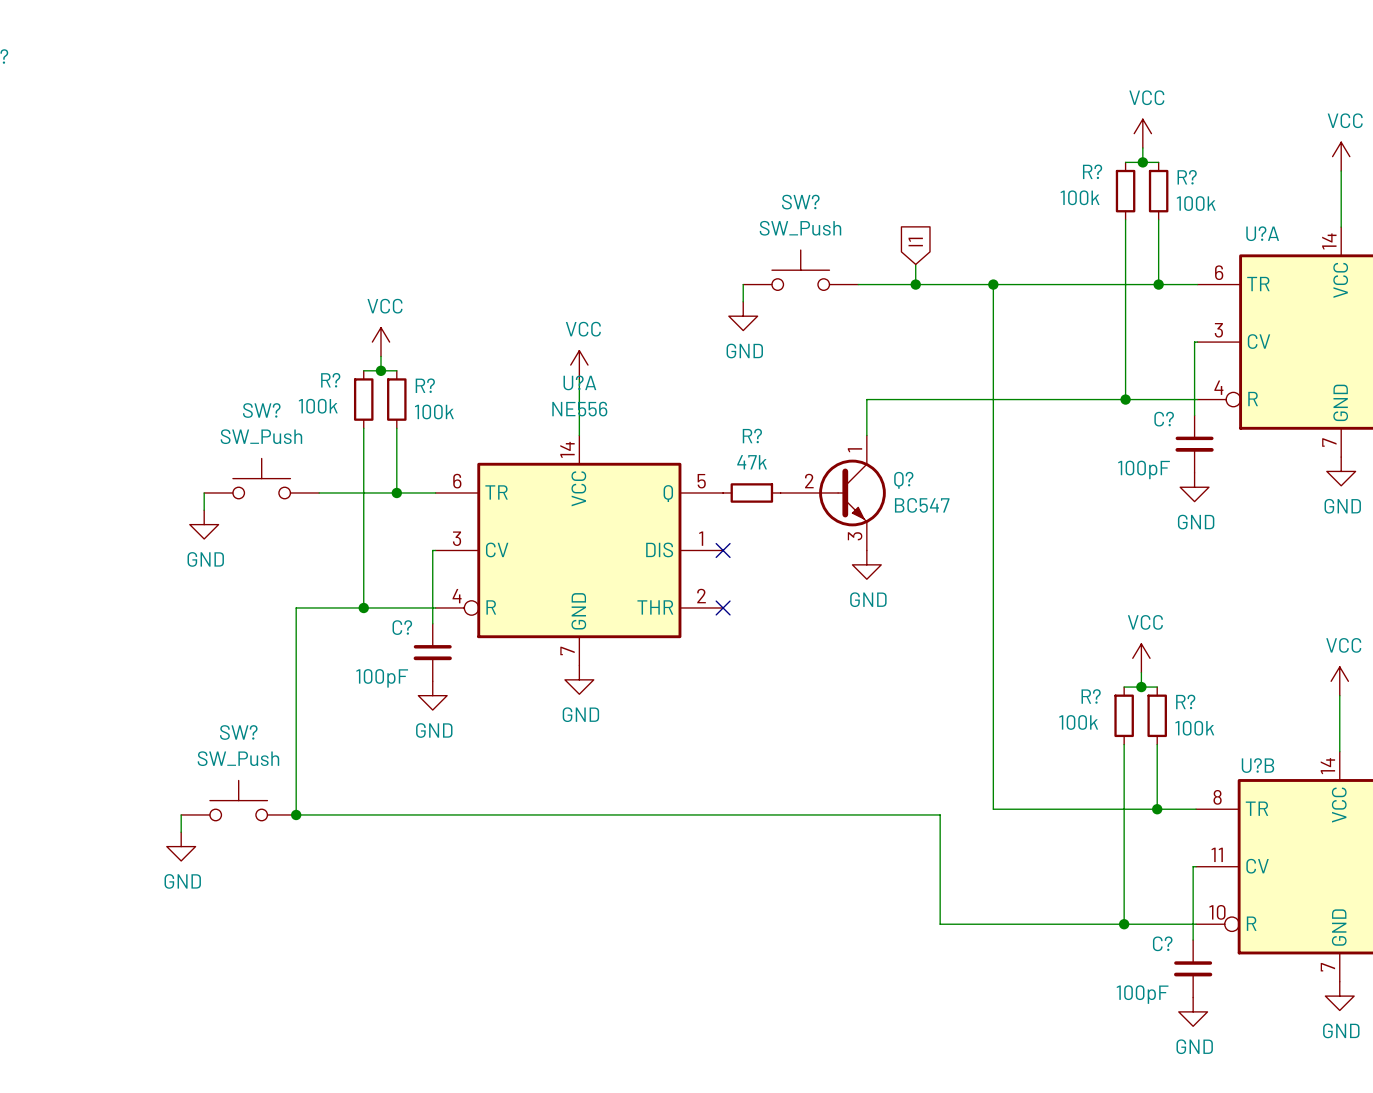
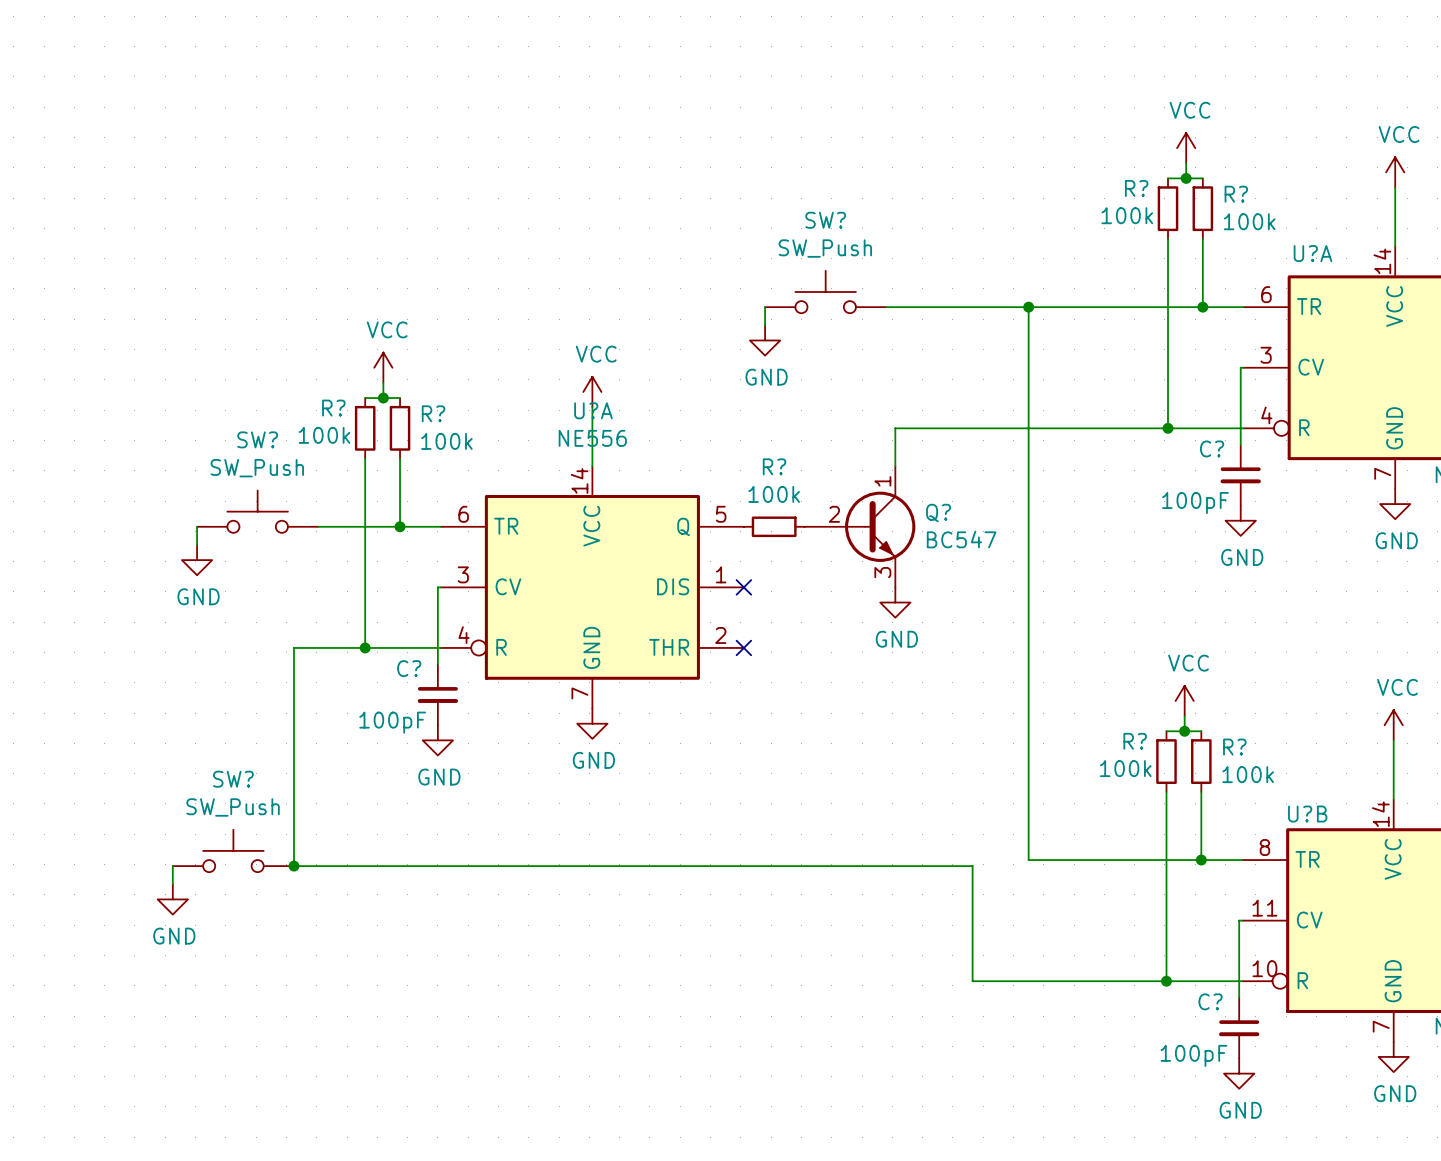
global label: I1 (915, 242) -> none
wire: (915, 264) (915, 284) -> none
junction: (915, 284) -> none
R? value: 47k (752, 462) -> 100k (774, 494)

